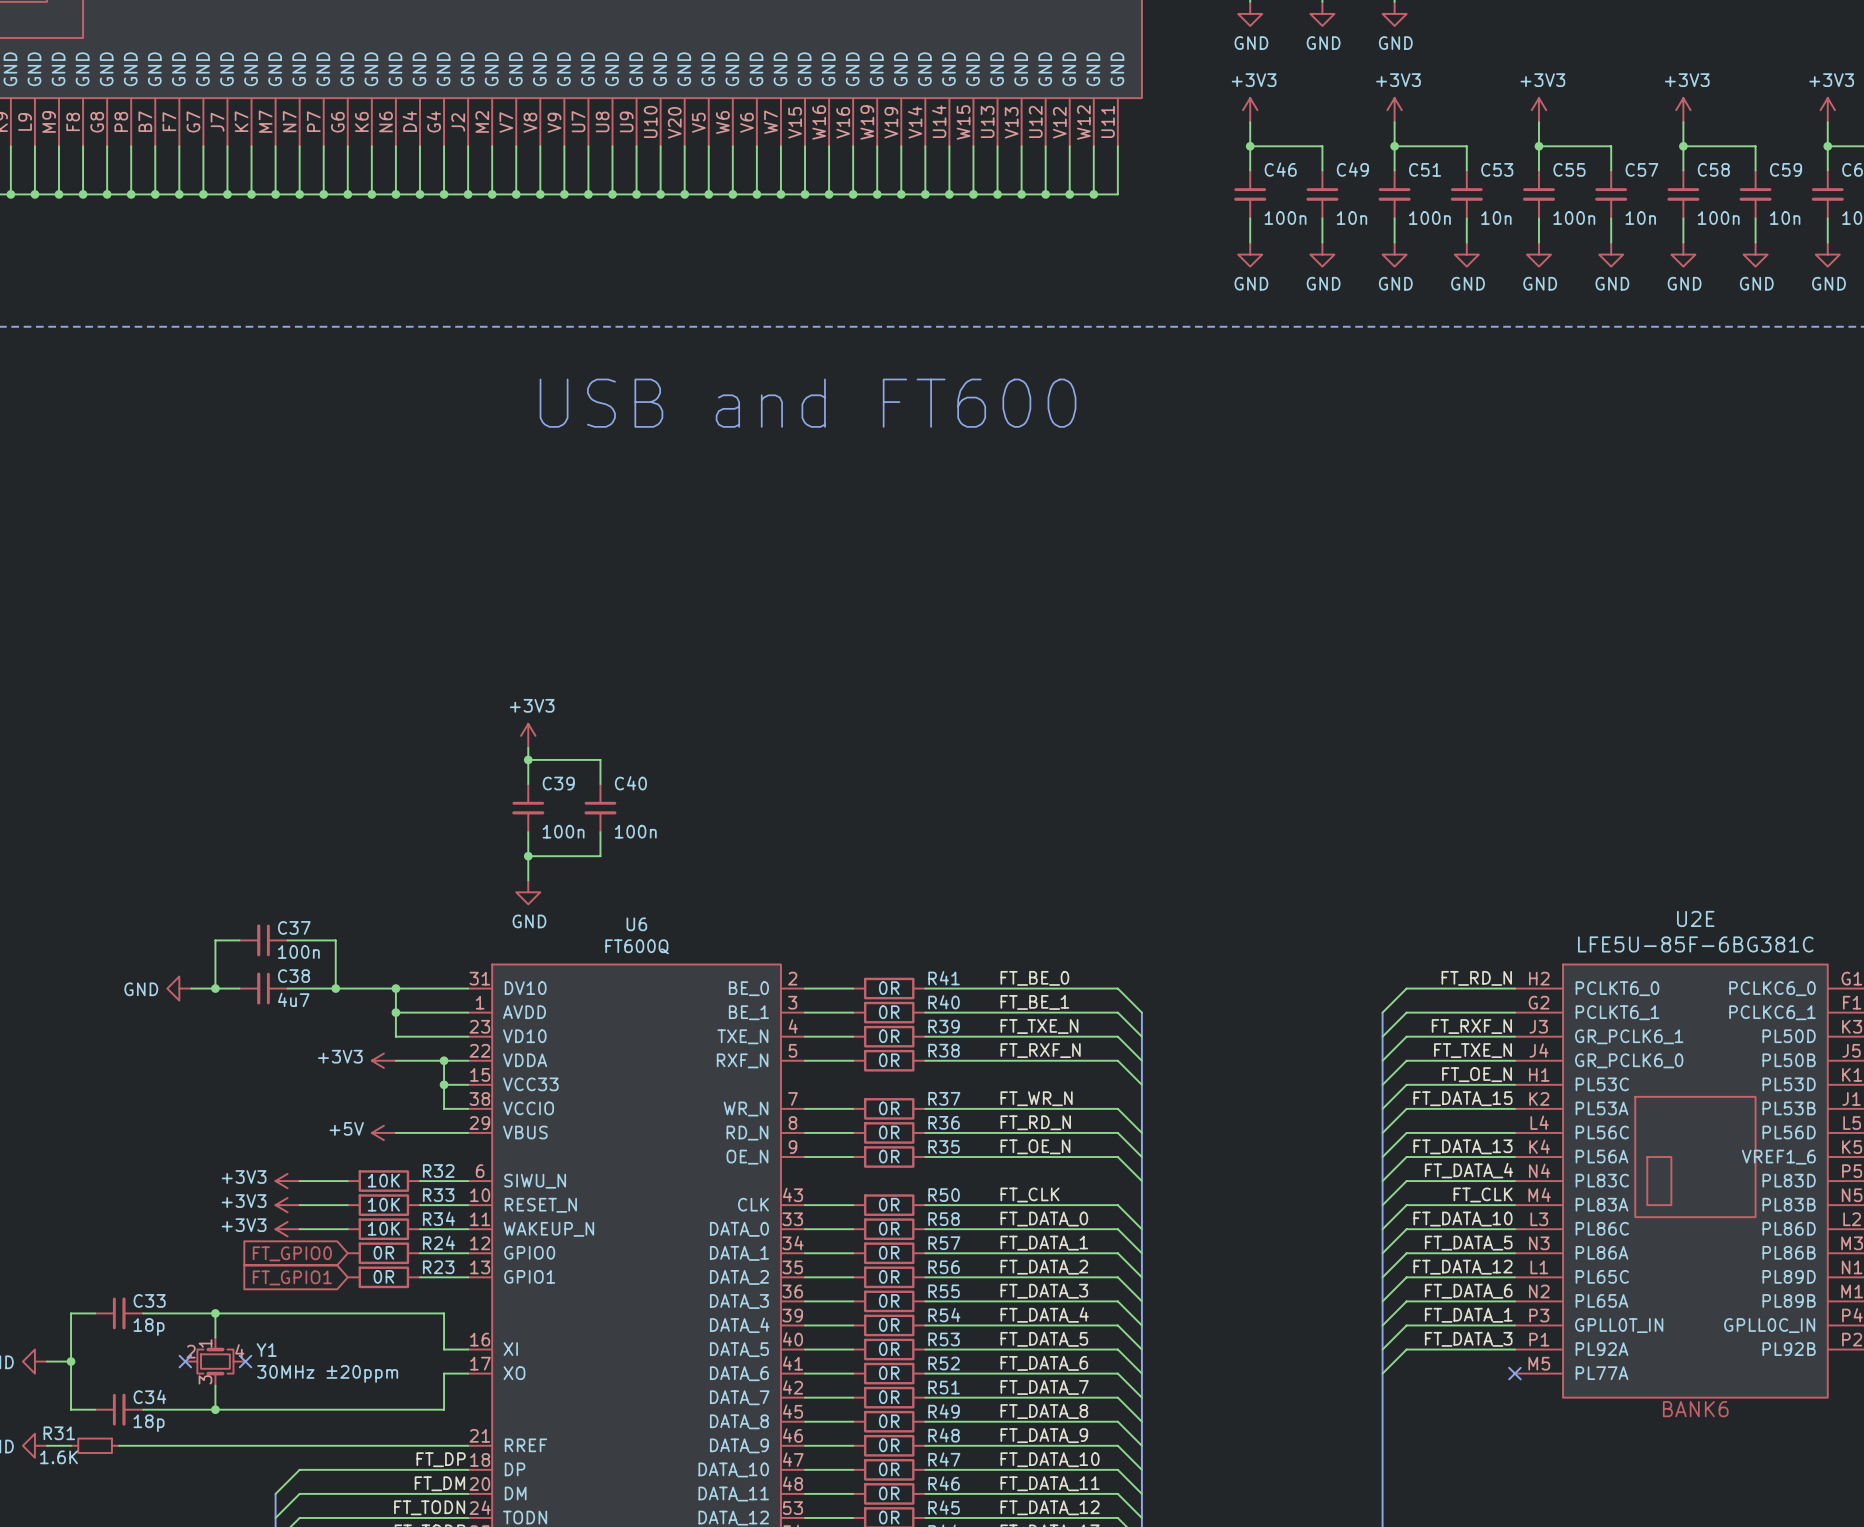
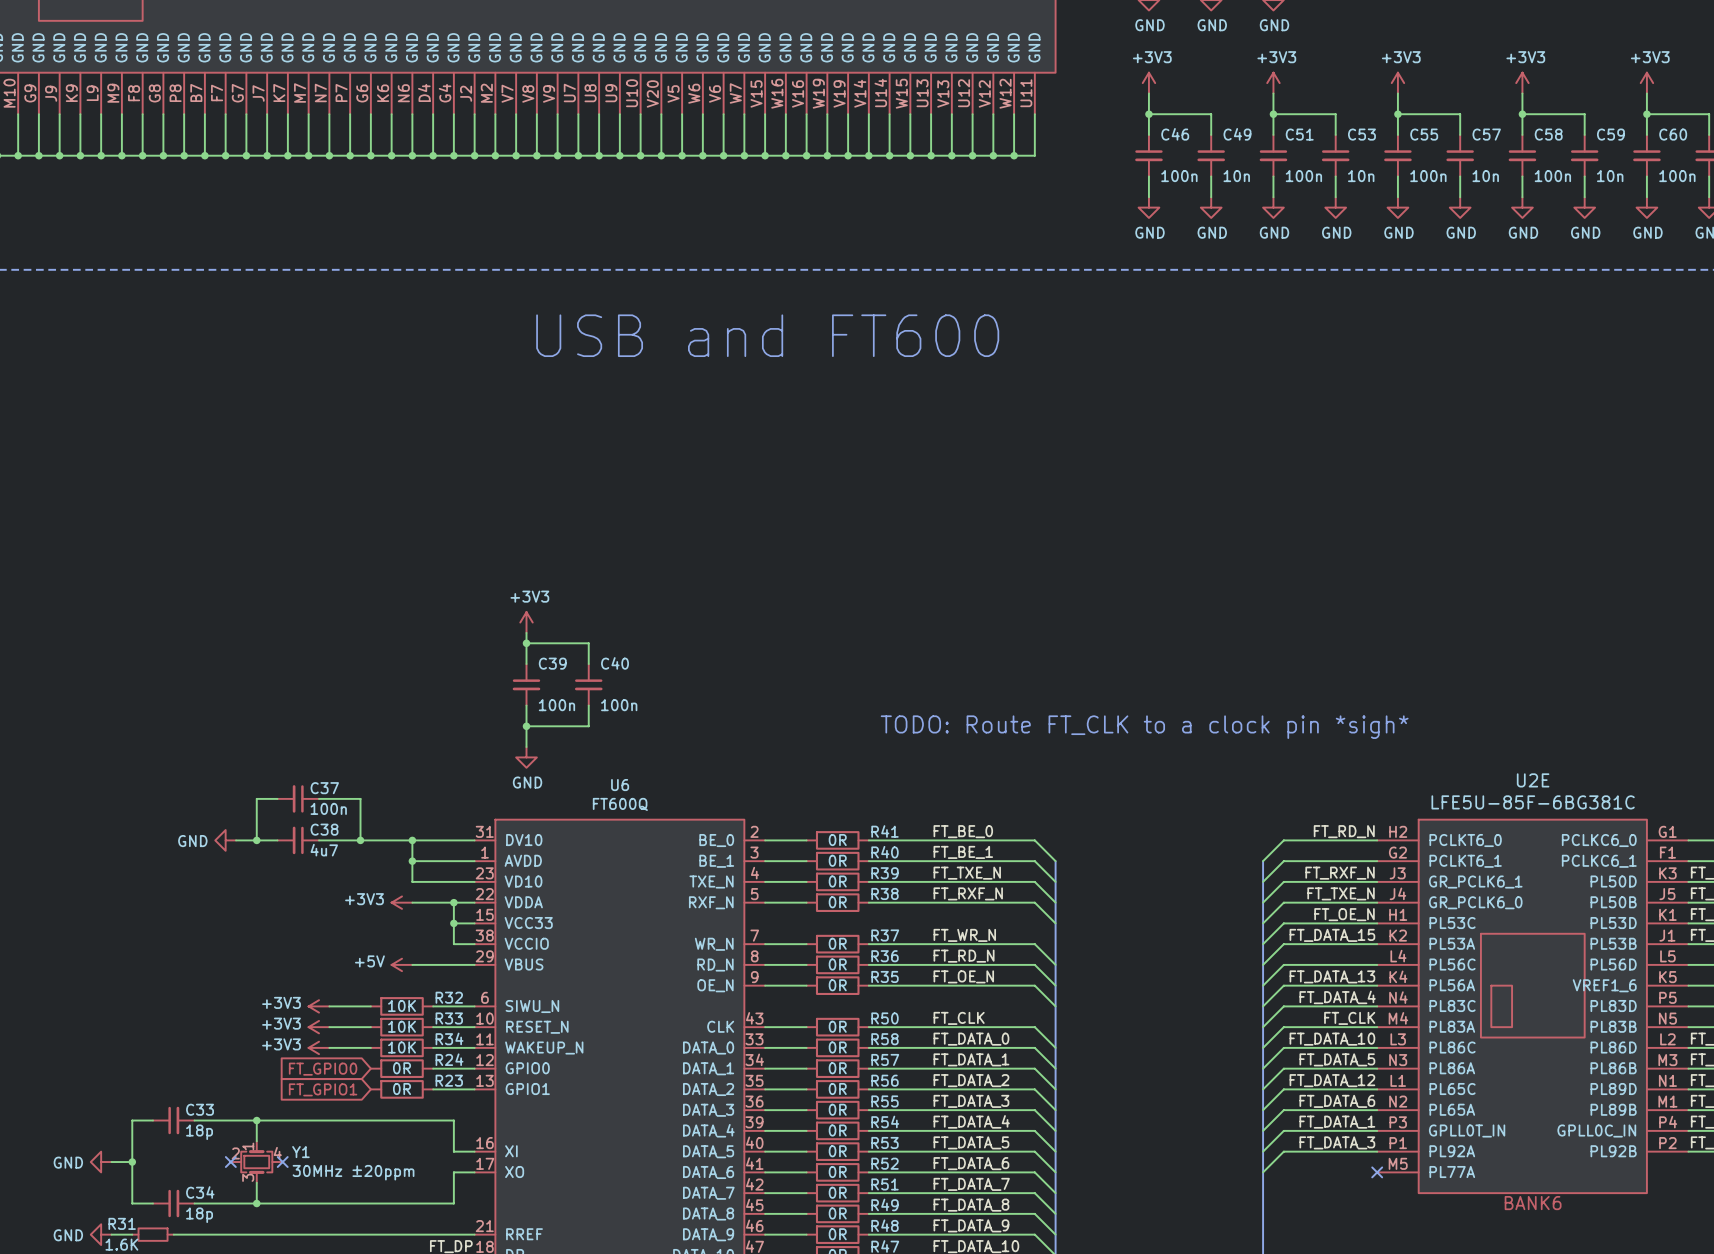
text: none -> TODO: Route FT_CLK to a clock pin *sigh* (1144, 727)

